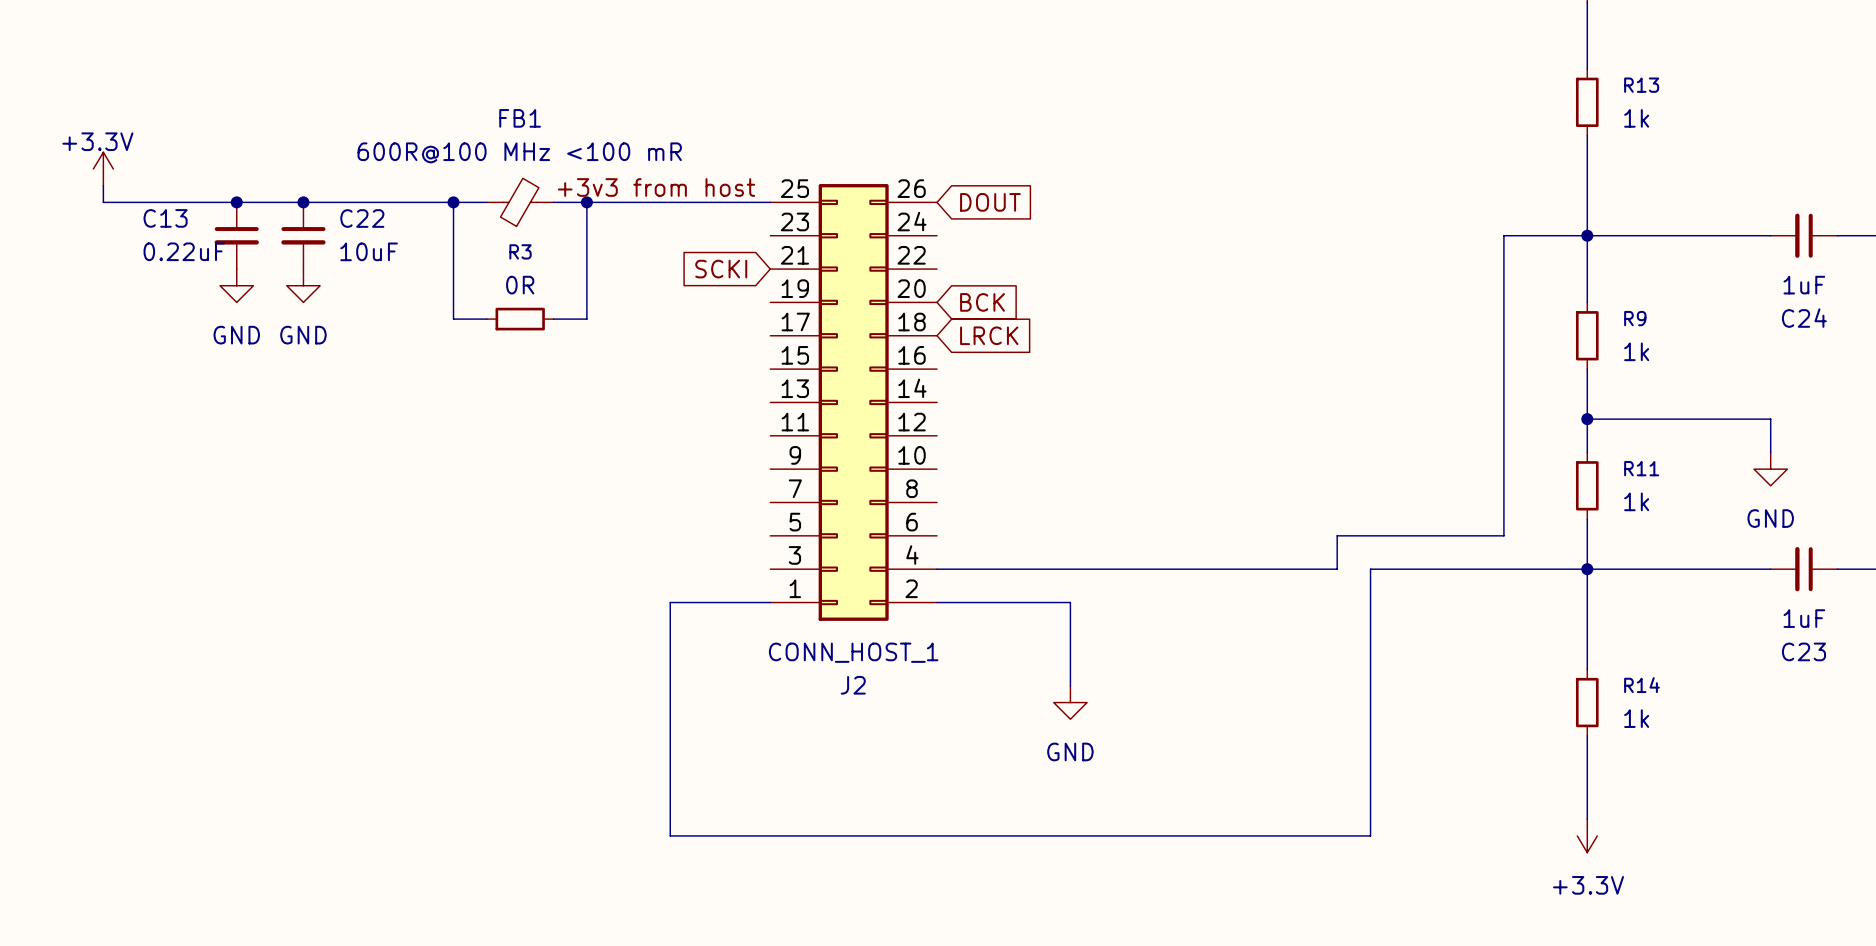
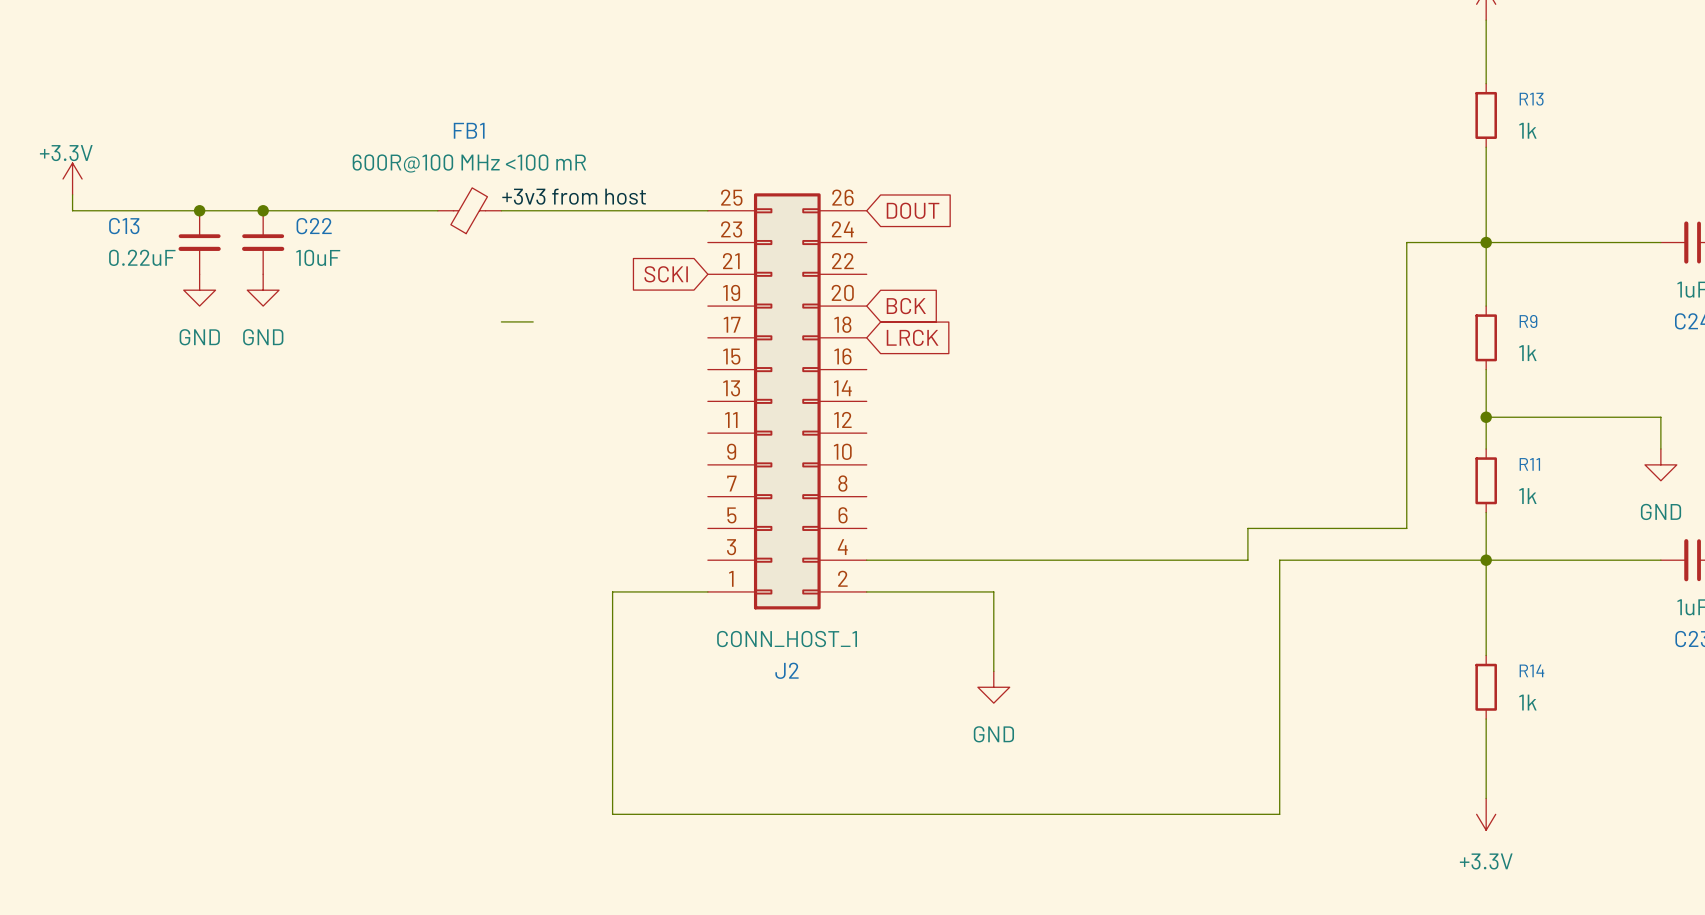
wire: (453, 202) (453, 319) (486, 319) -> none
junction: (453, 202) -> none
wire: (586, 202) (586, 319) -> none
junction: (586, 202) -> none
R3: 0R (520, 319) -> none

